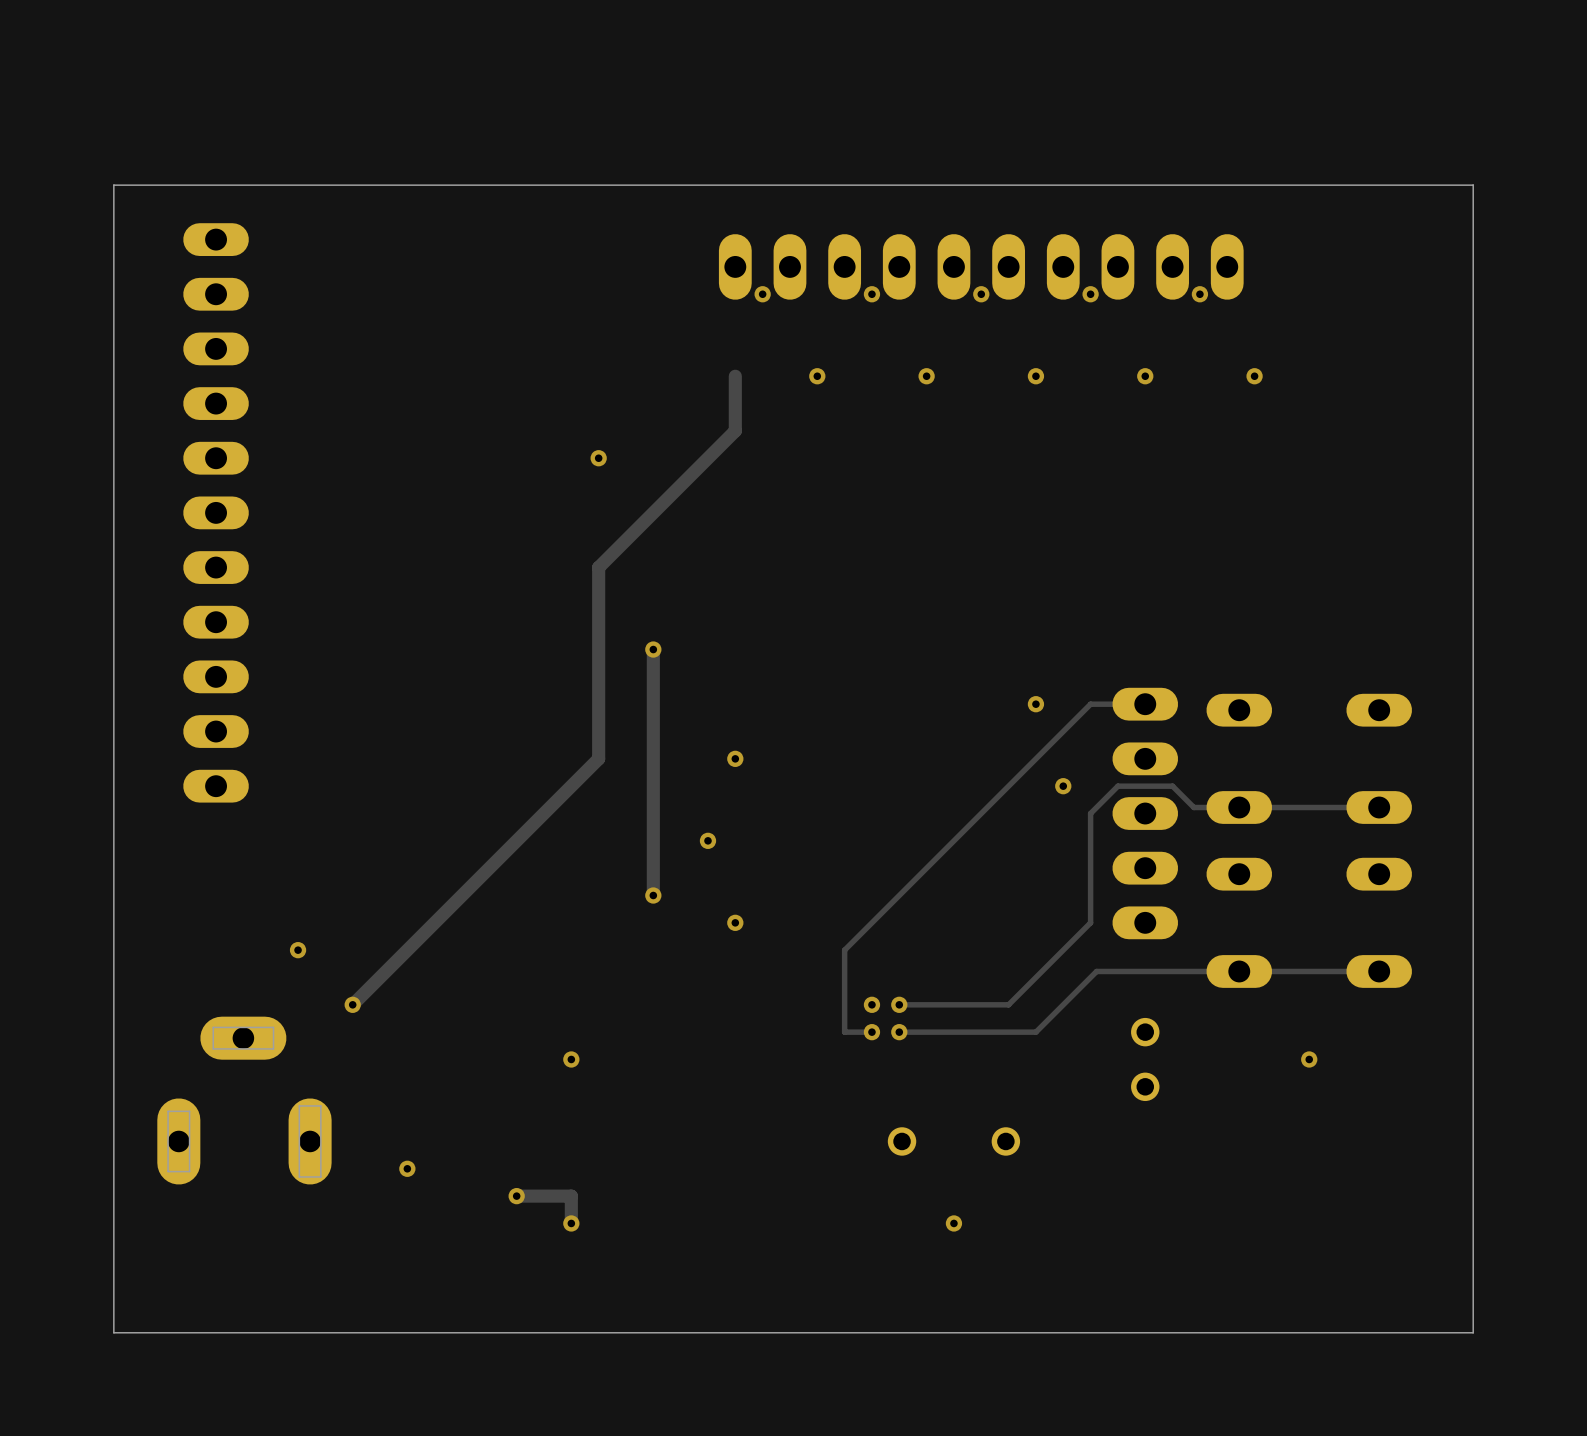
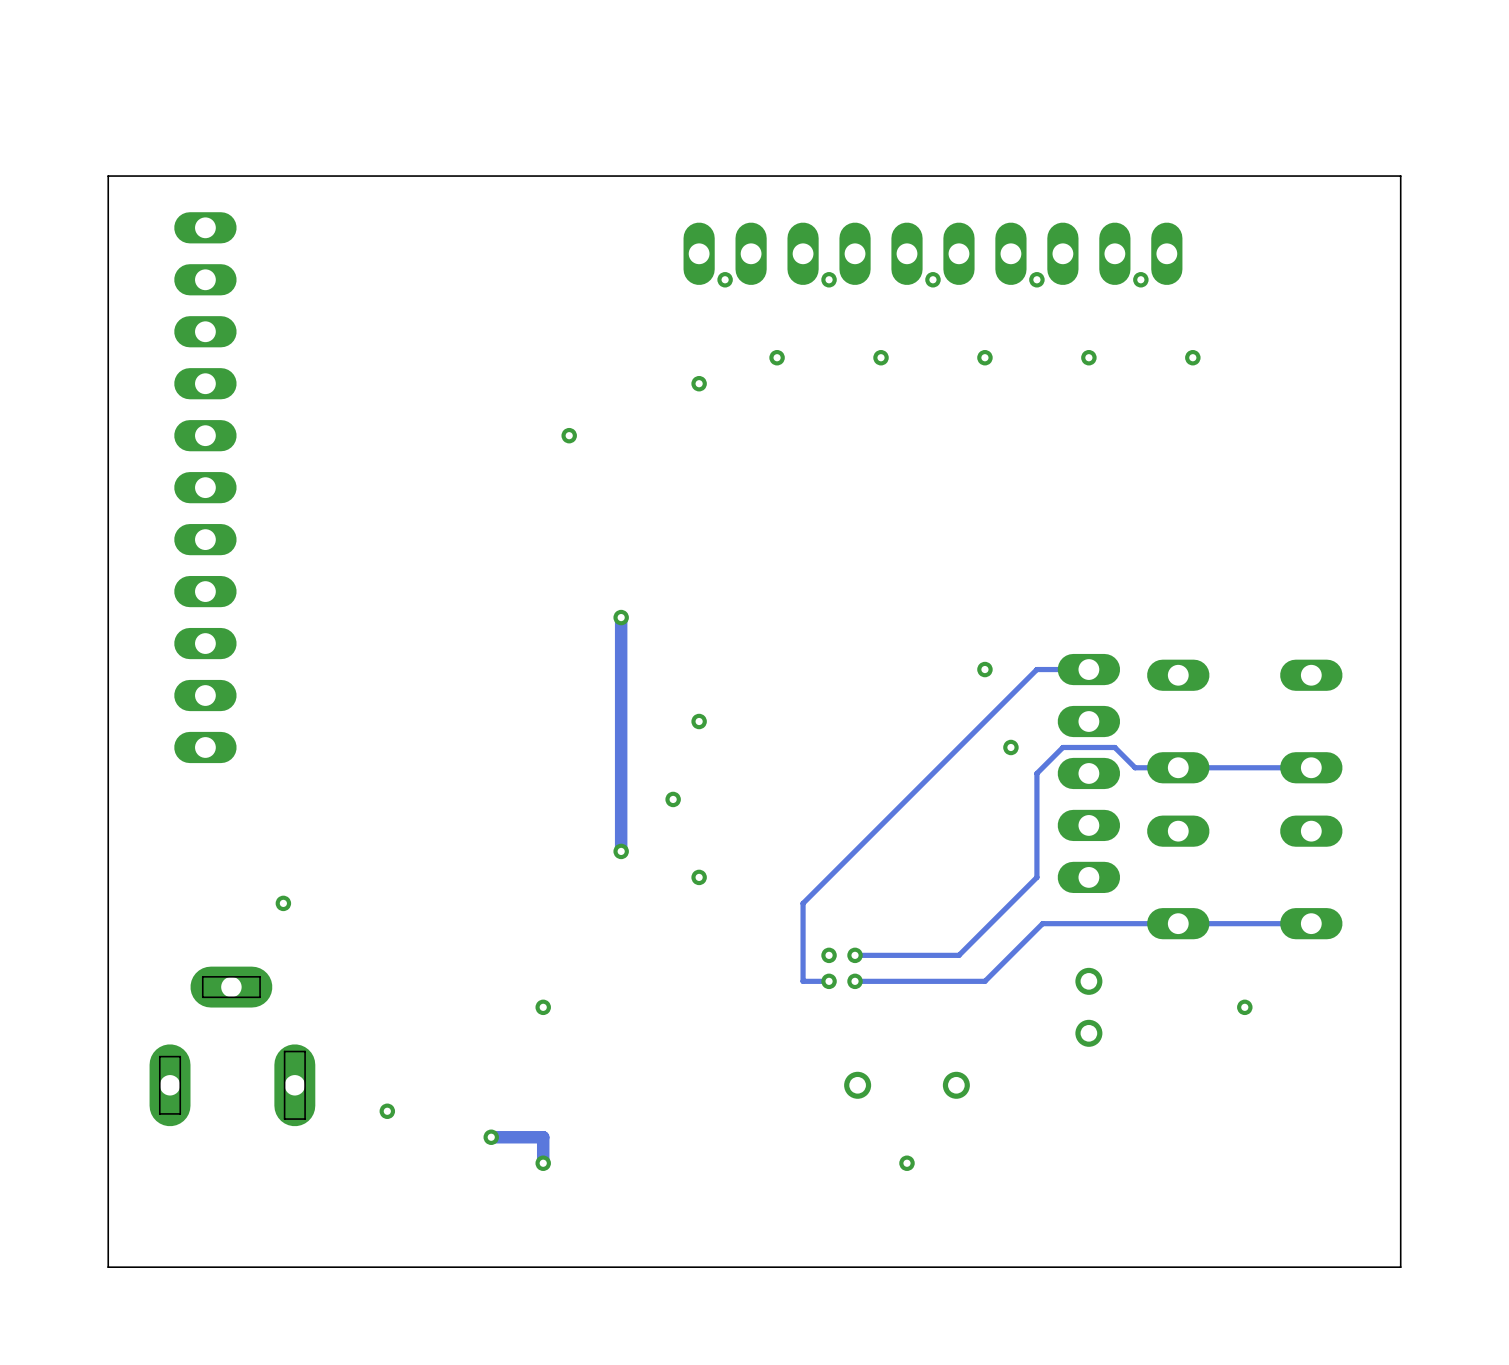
track: (735, 376) (735, 430) (598, 567) (598, 758) (352, 1004) -> none
via: none -> (699, 383)
via: (352, 1004) -> none

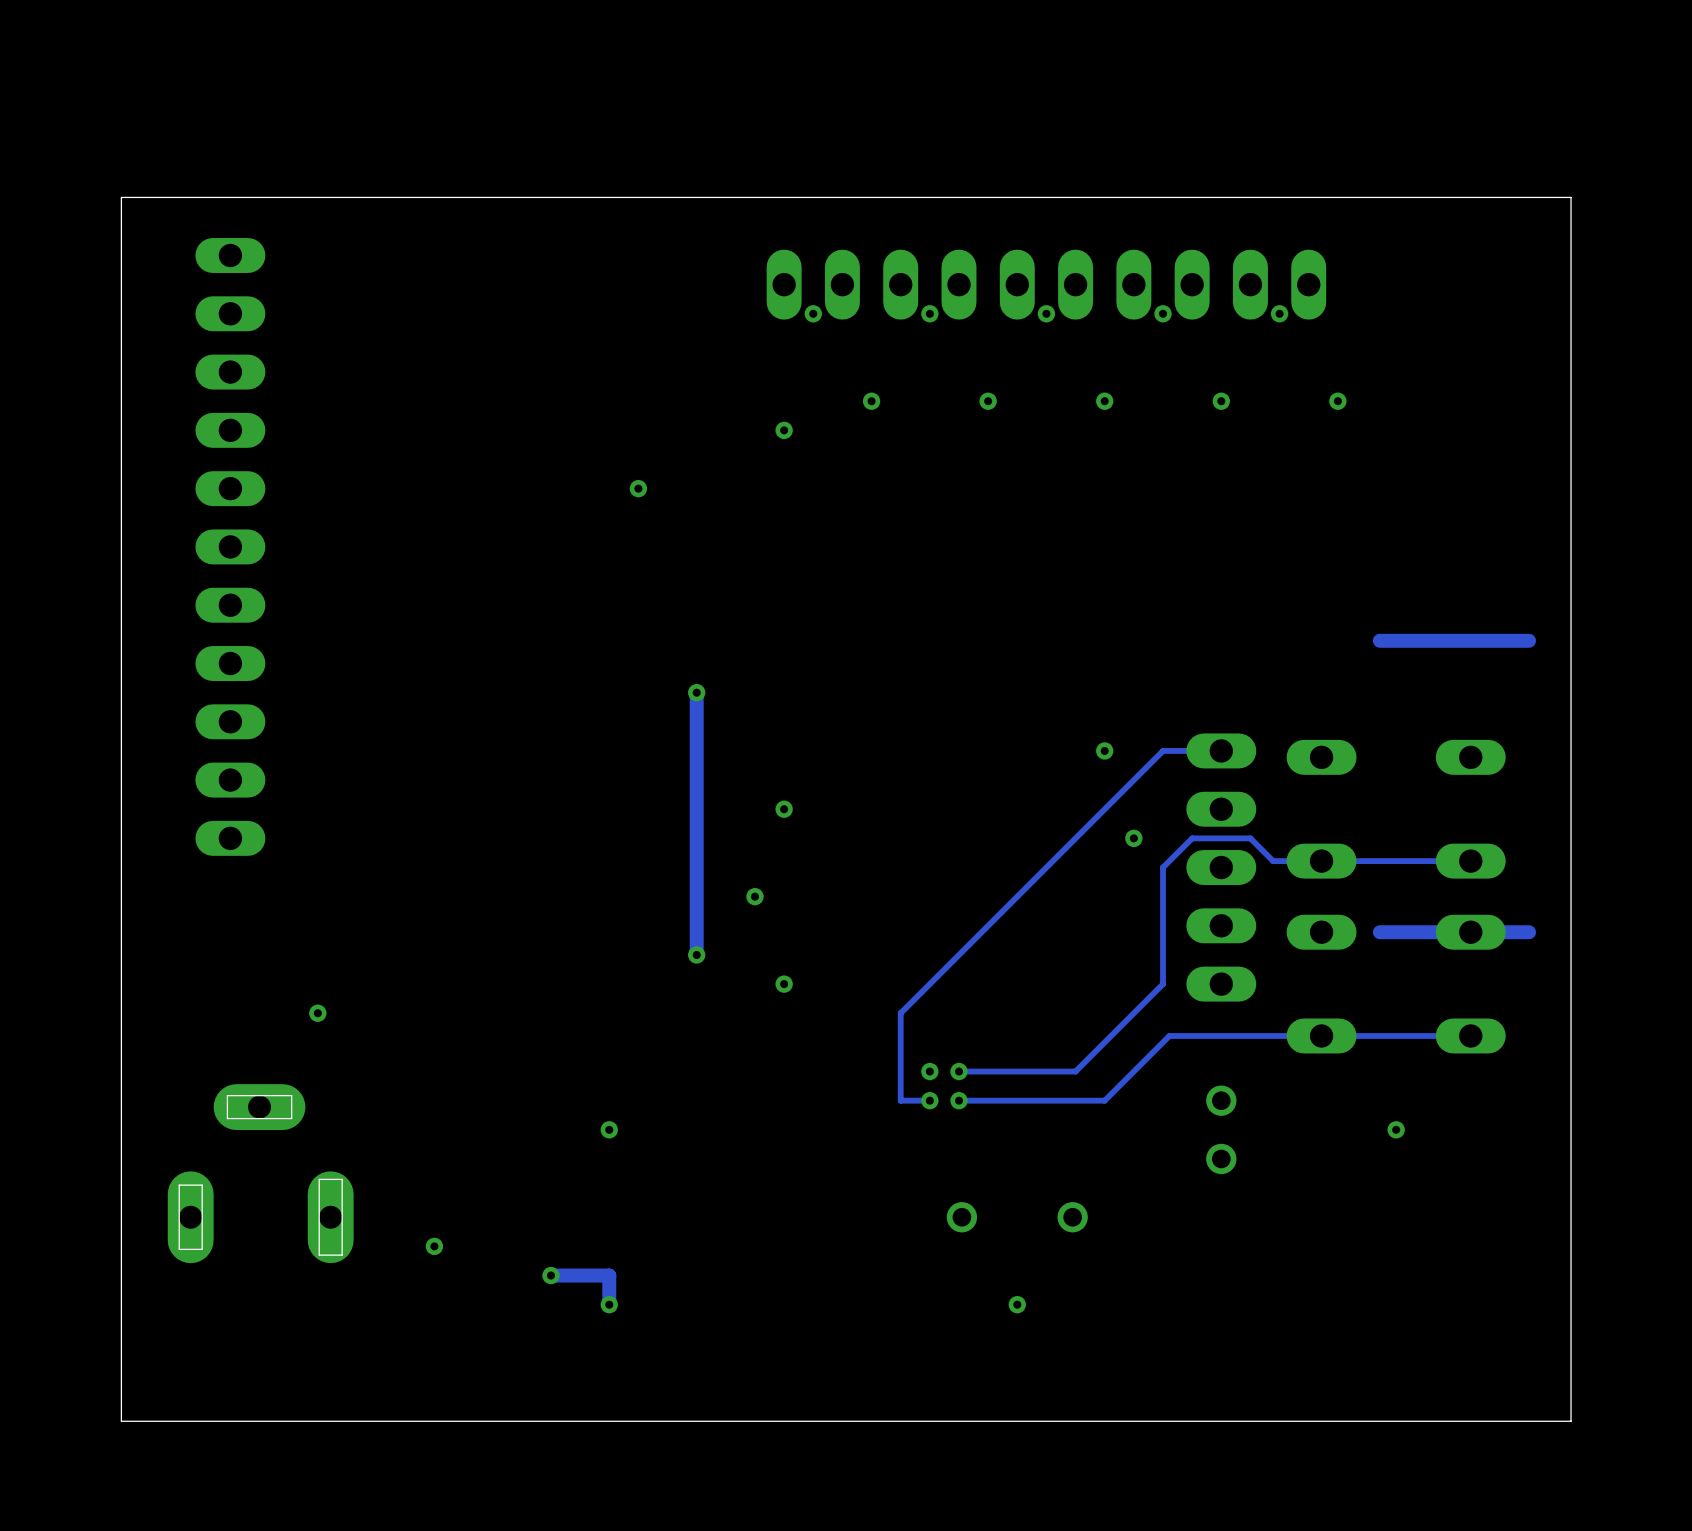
track: none -> (1529, 640) (1379, 640)
track: none -> (1529, 932) (1379, 932)

